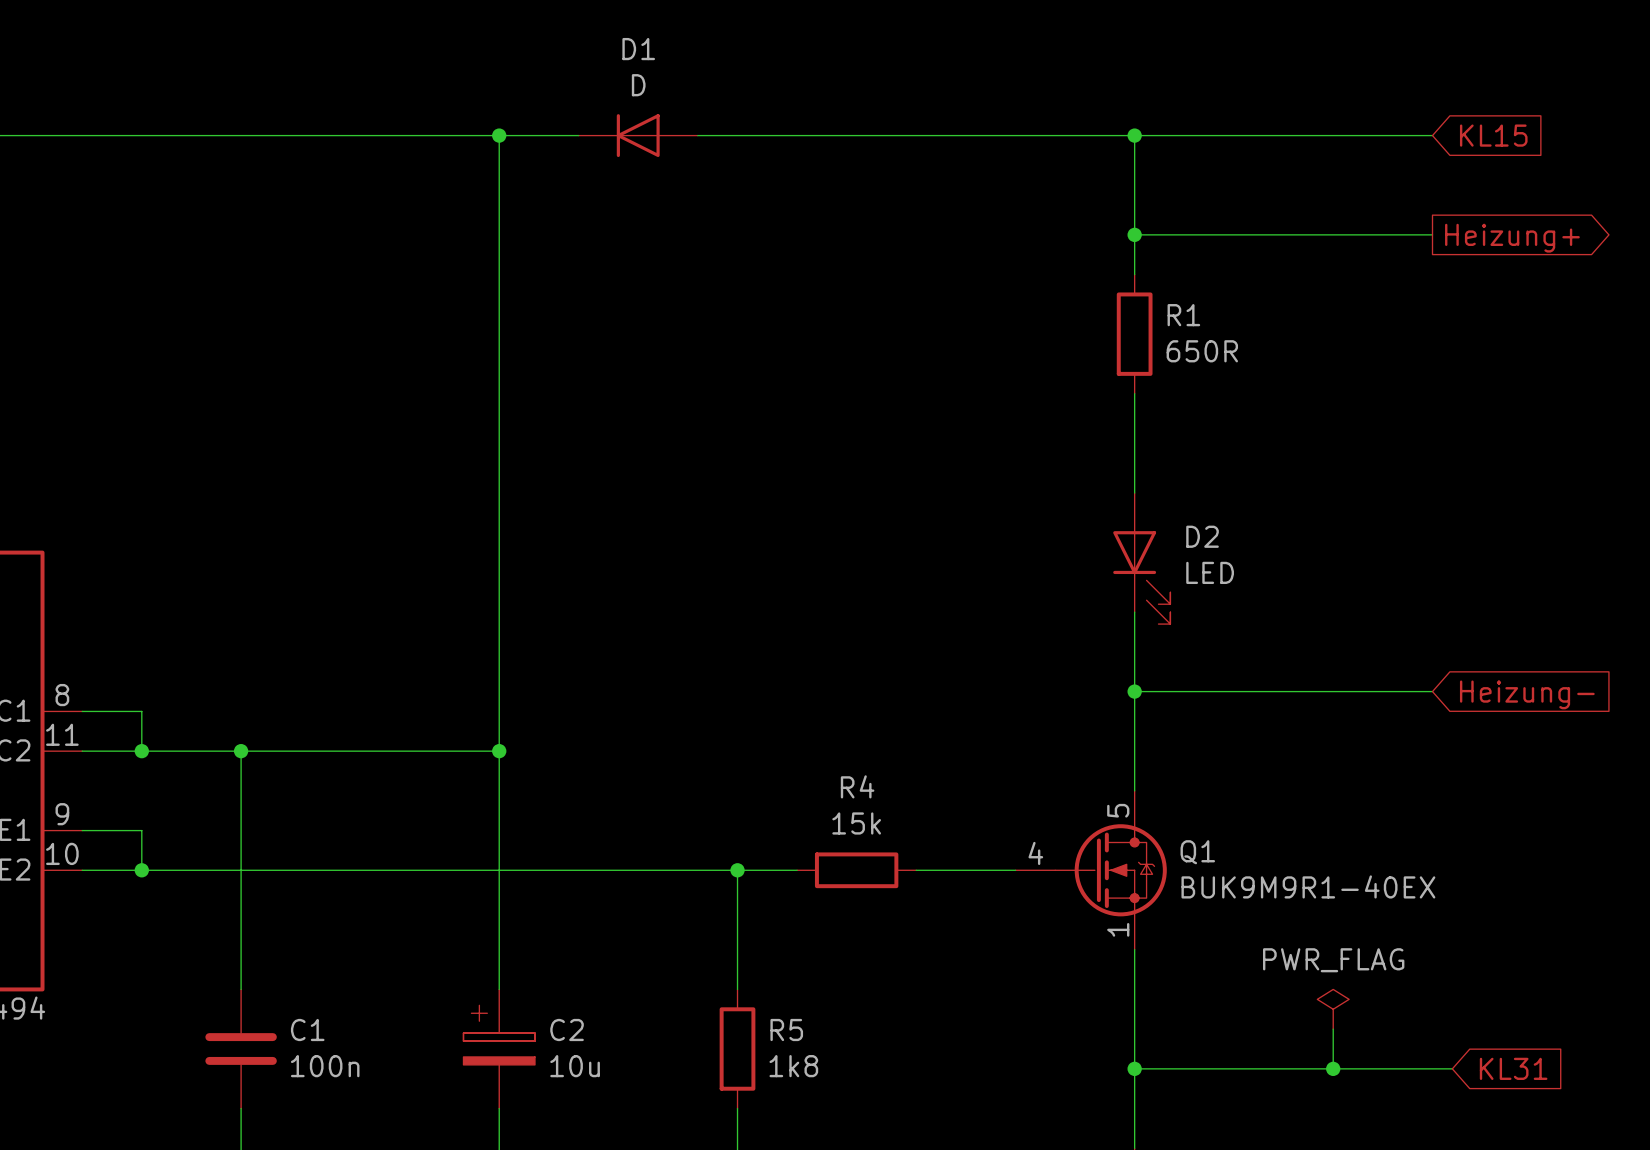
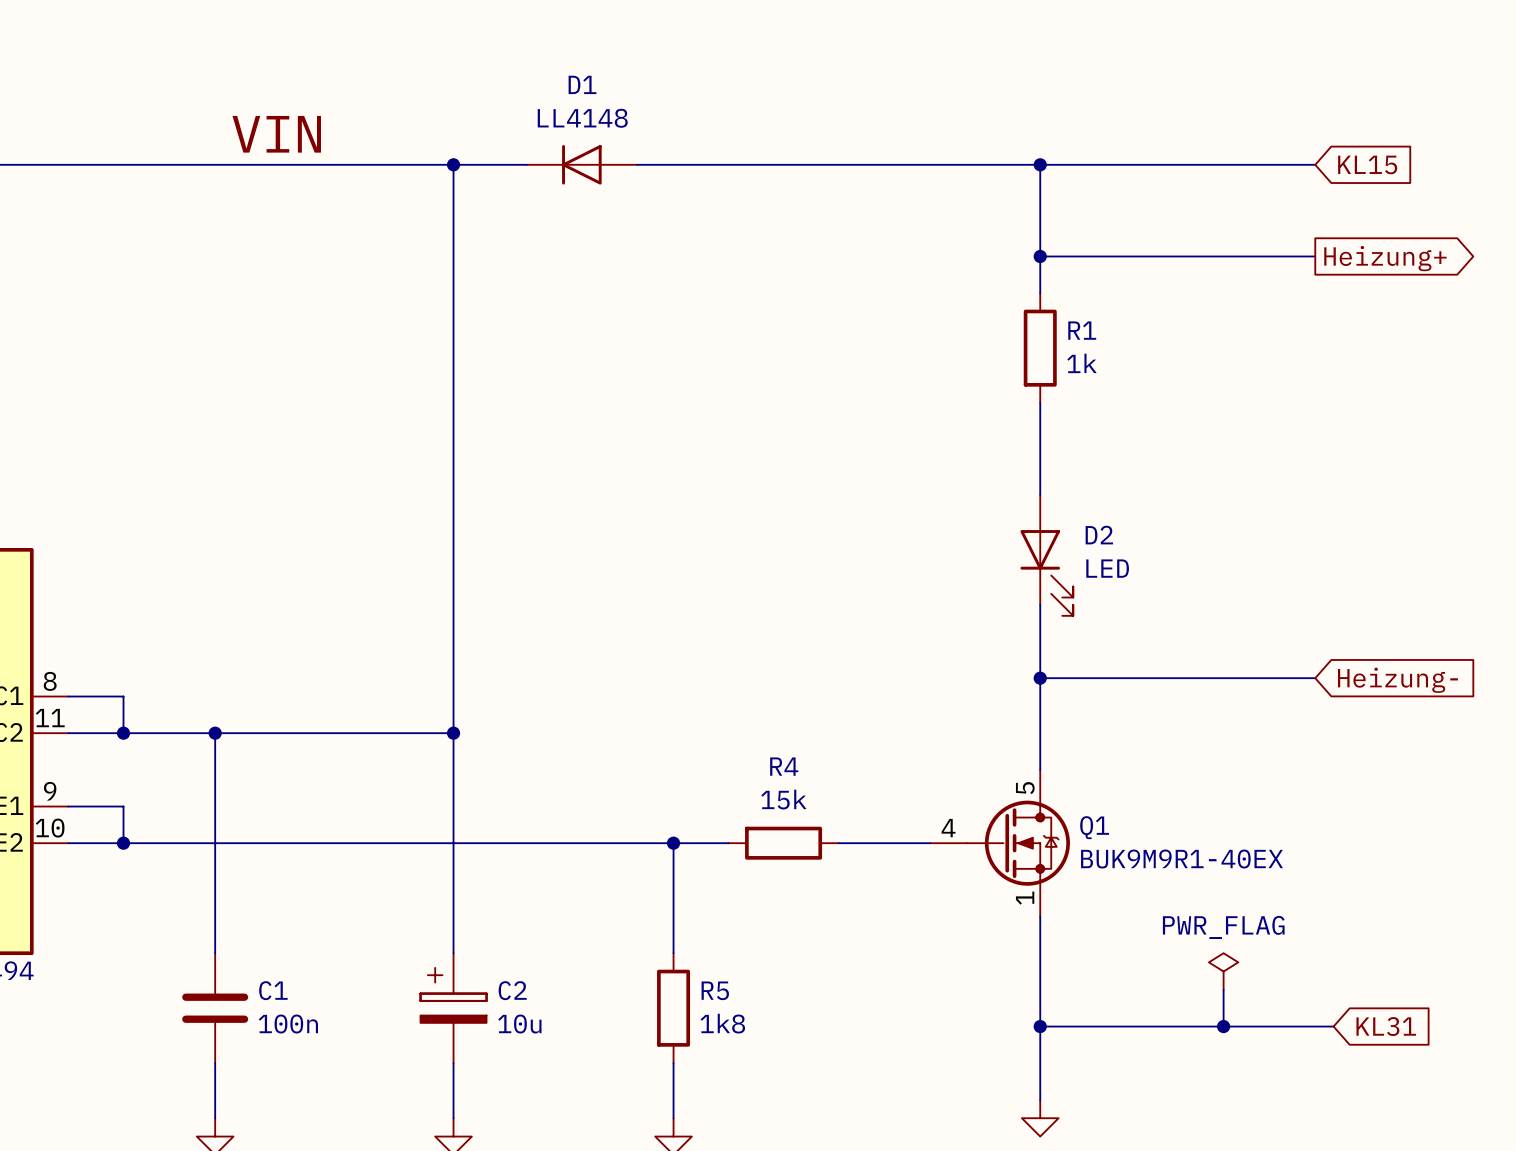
D1 value: D (638, 85) -> LL4148 (582, 118)
label: none -> VIN (276, 134)
R1 value: 650R (1202, 351) -> 1k (1082, 363)

